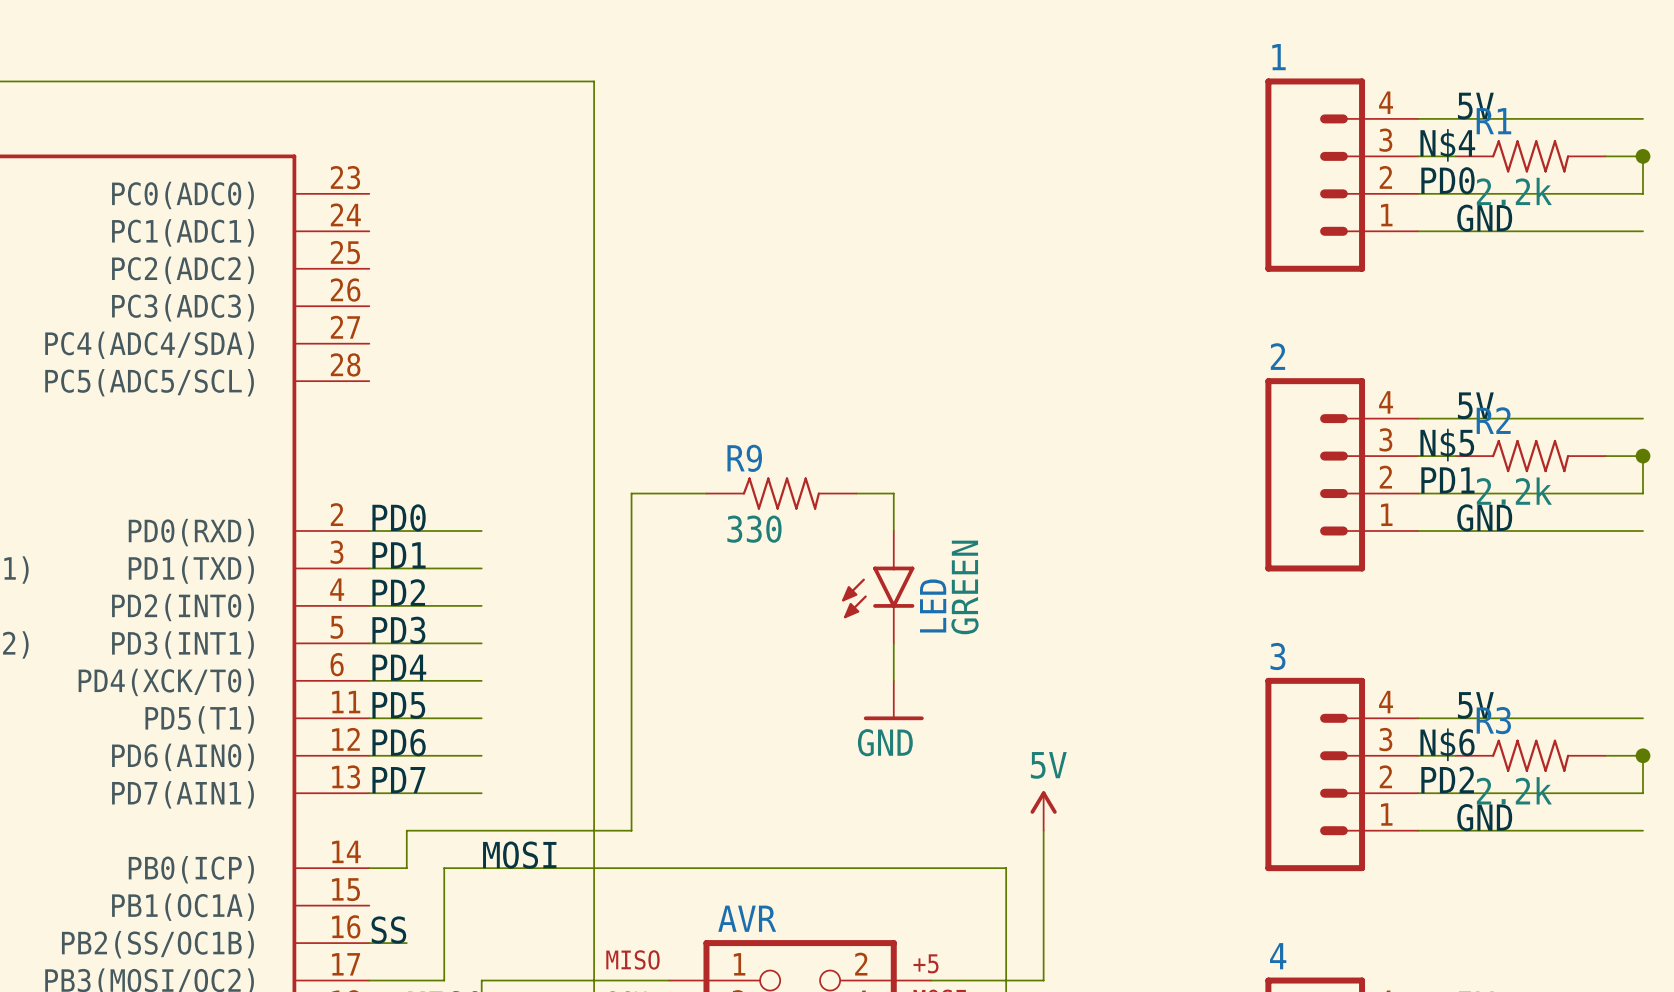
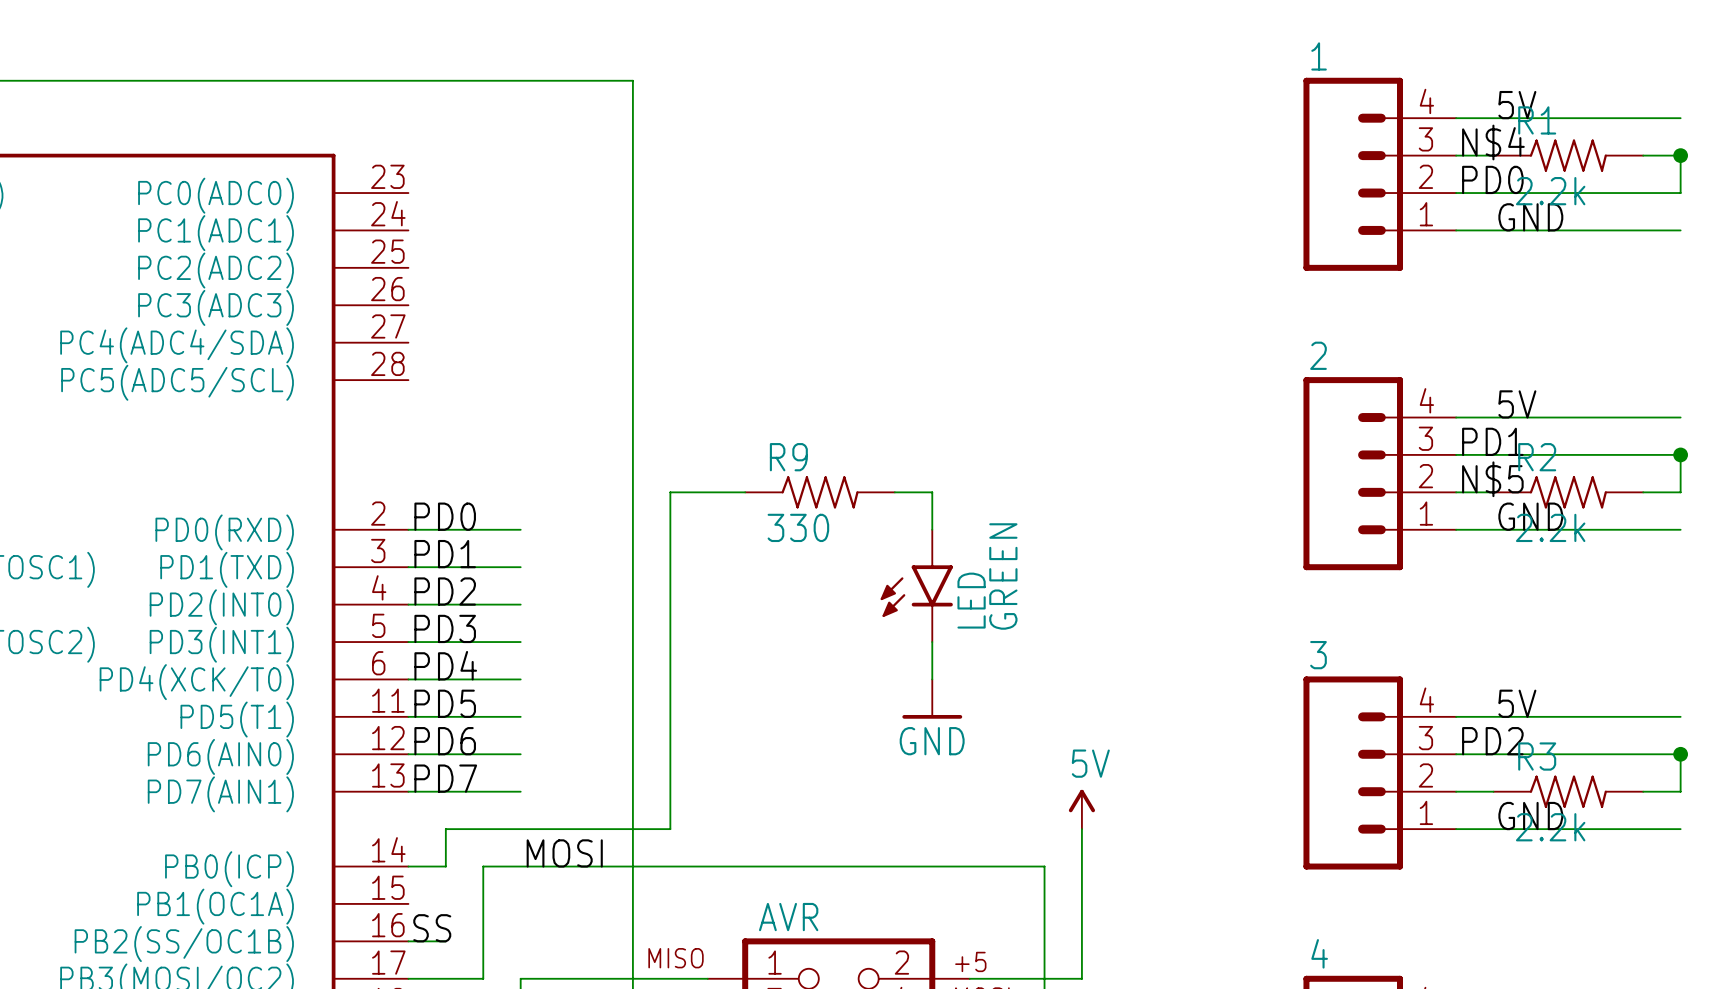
label: N$5 (1447, 445) -> PD1 (1492, 441)
R2 position: (1530, 456) -> (1568, 492)
label: PD1 (1447, 480) -> N$5 (1492, 479)
label: N$6 (1447, 744) -> PD2 (1492, 741)
R3 position: (1530, 755) -> (1568, 791)
label: PD2 (1447, 779) -> none

